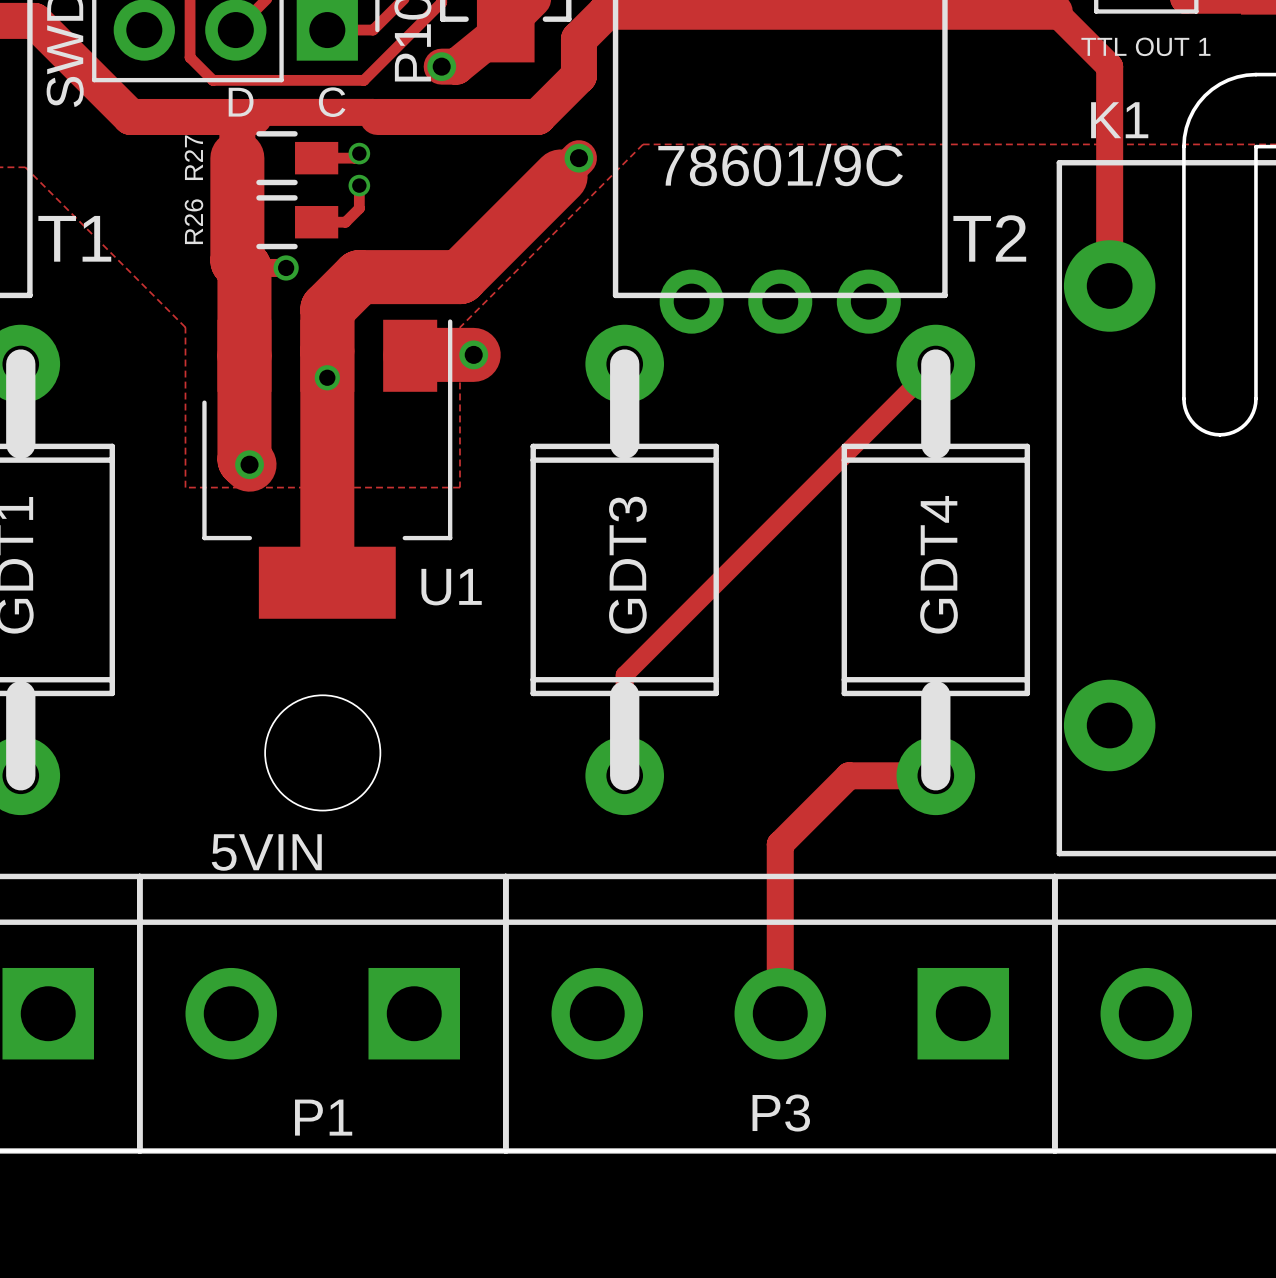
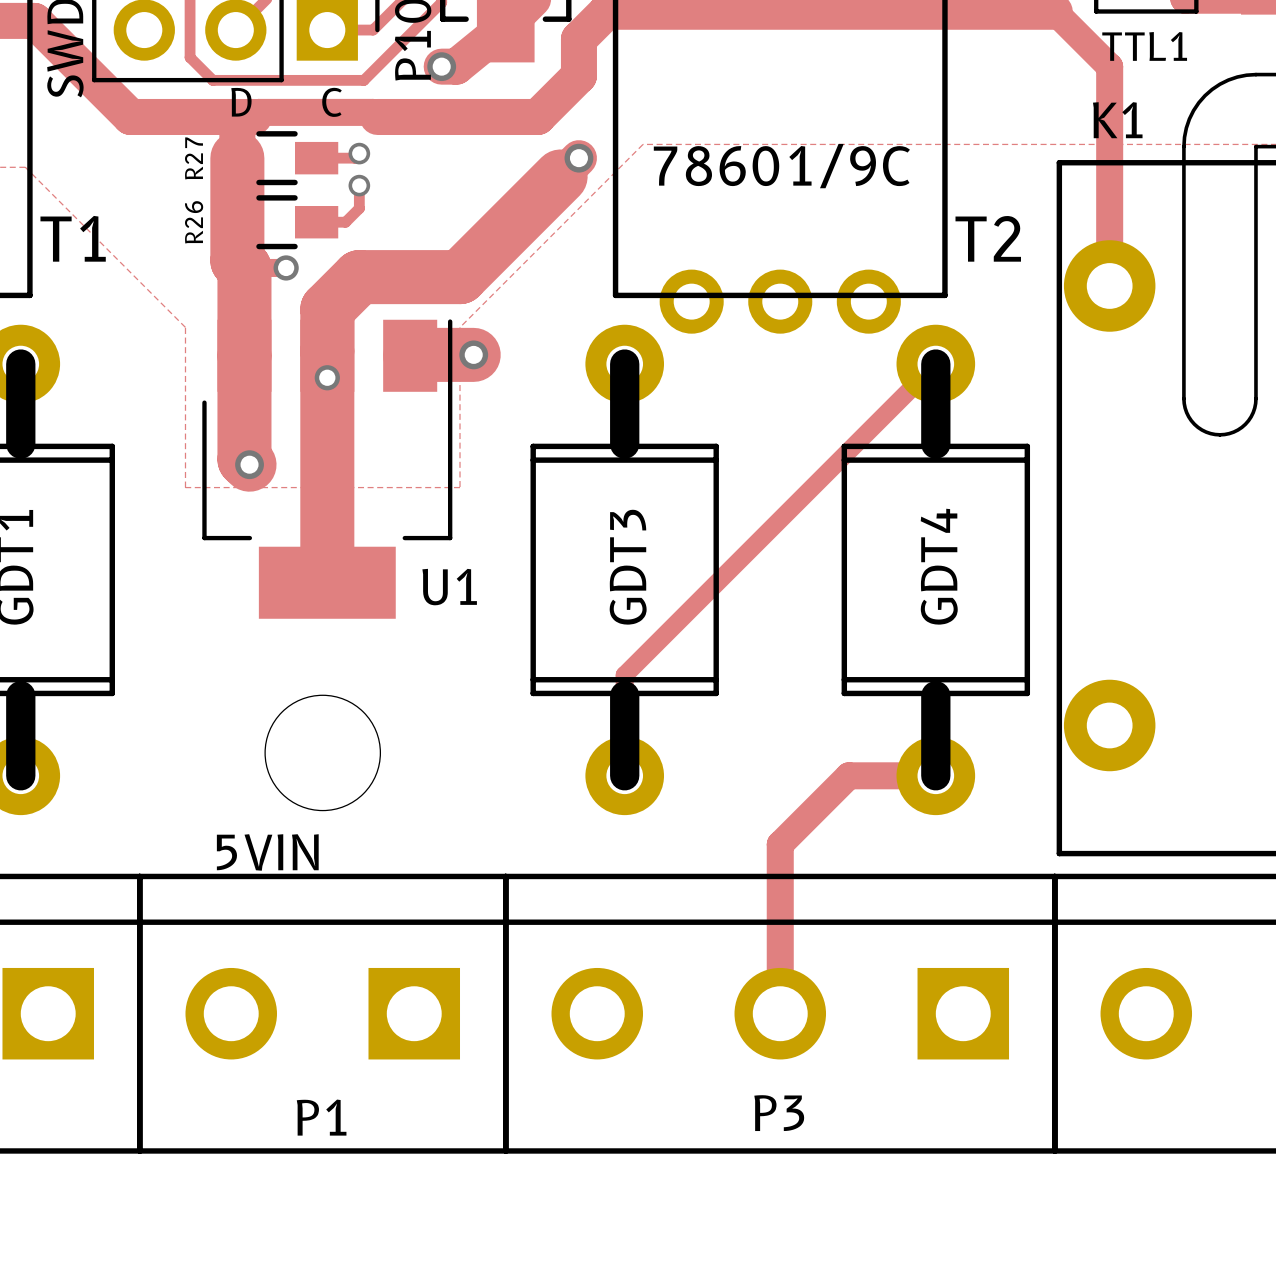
part value: TTL OUT 1 (1145, 46) -> TTL1 (1144, 46)

